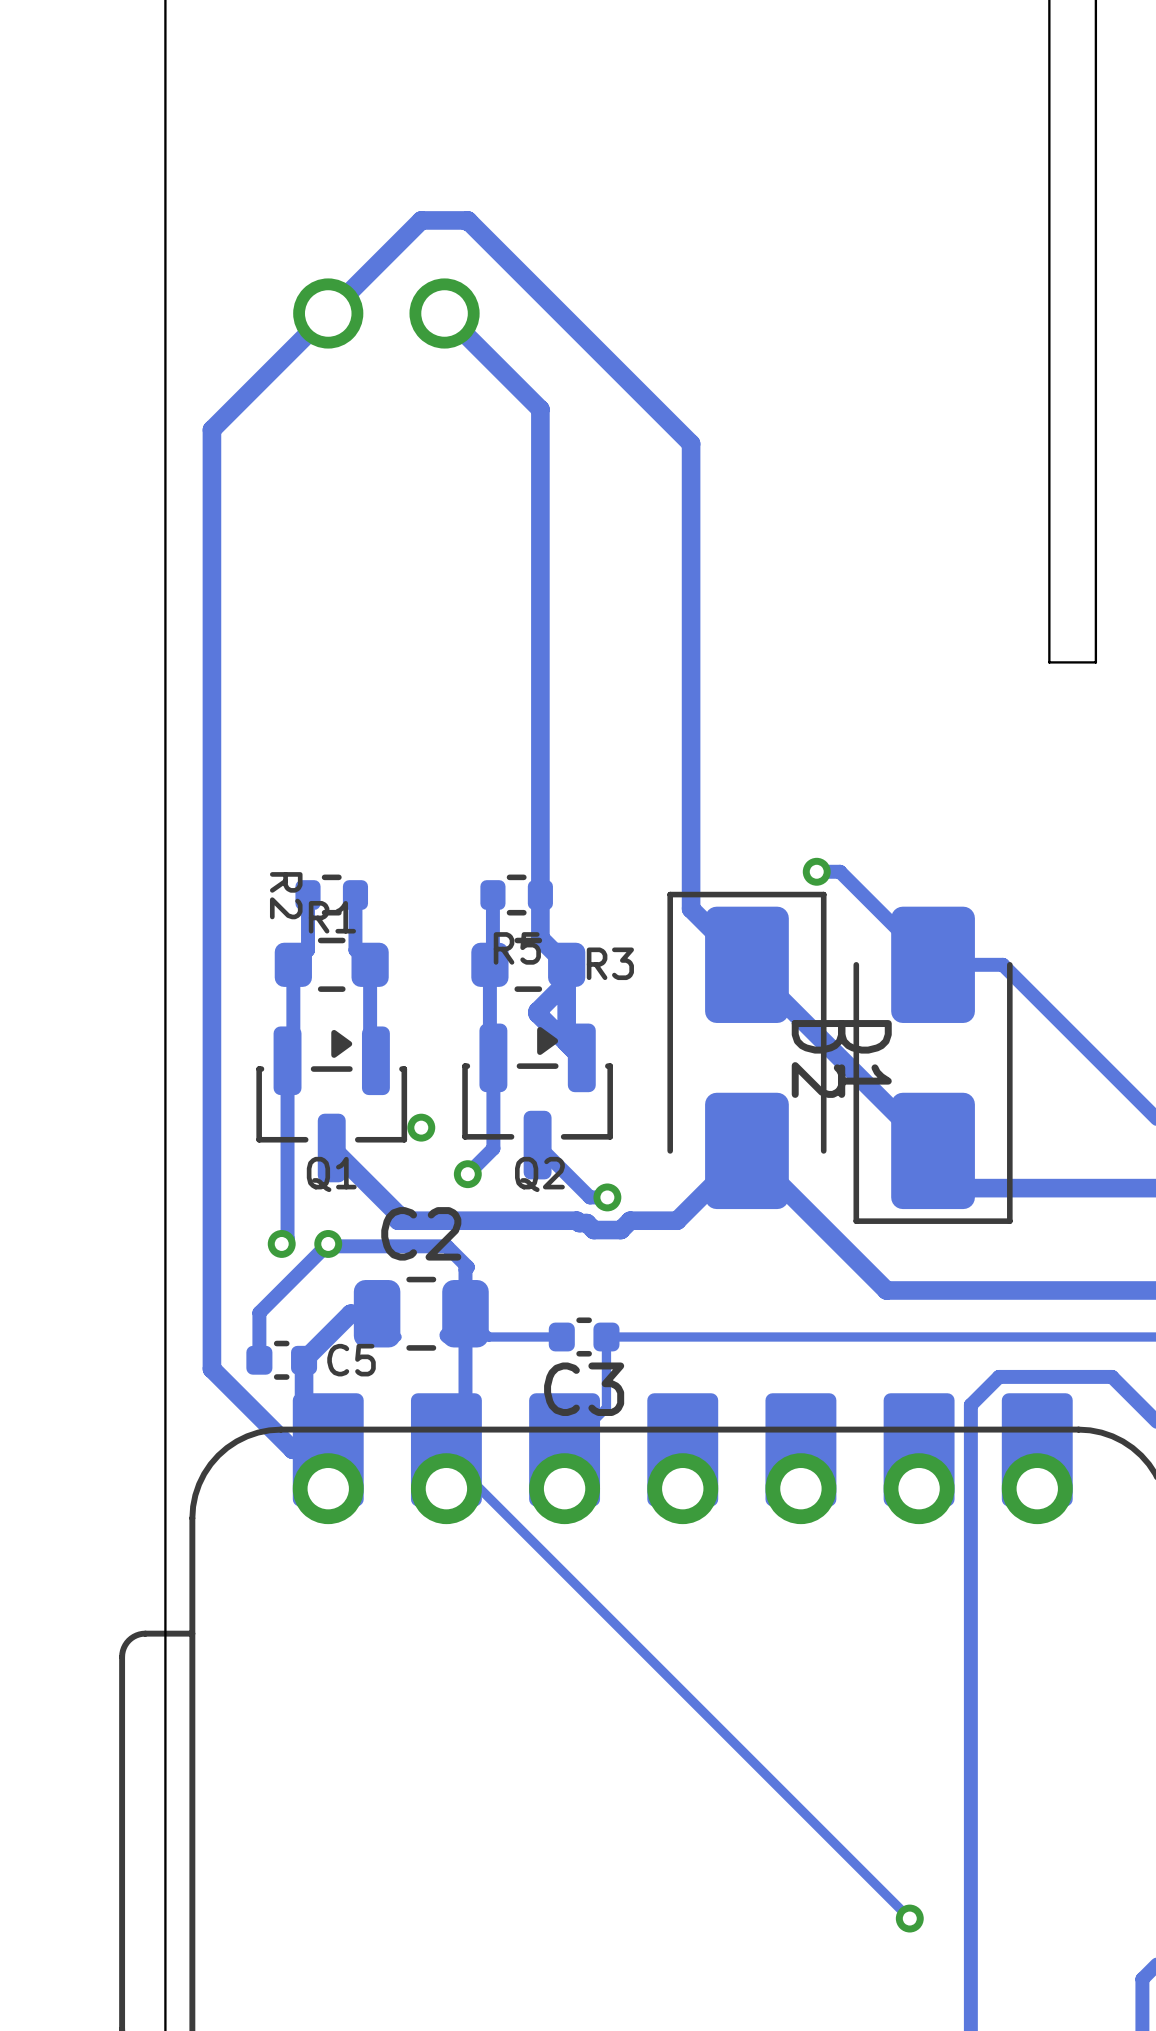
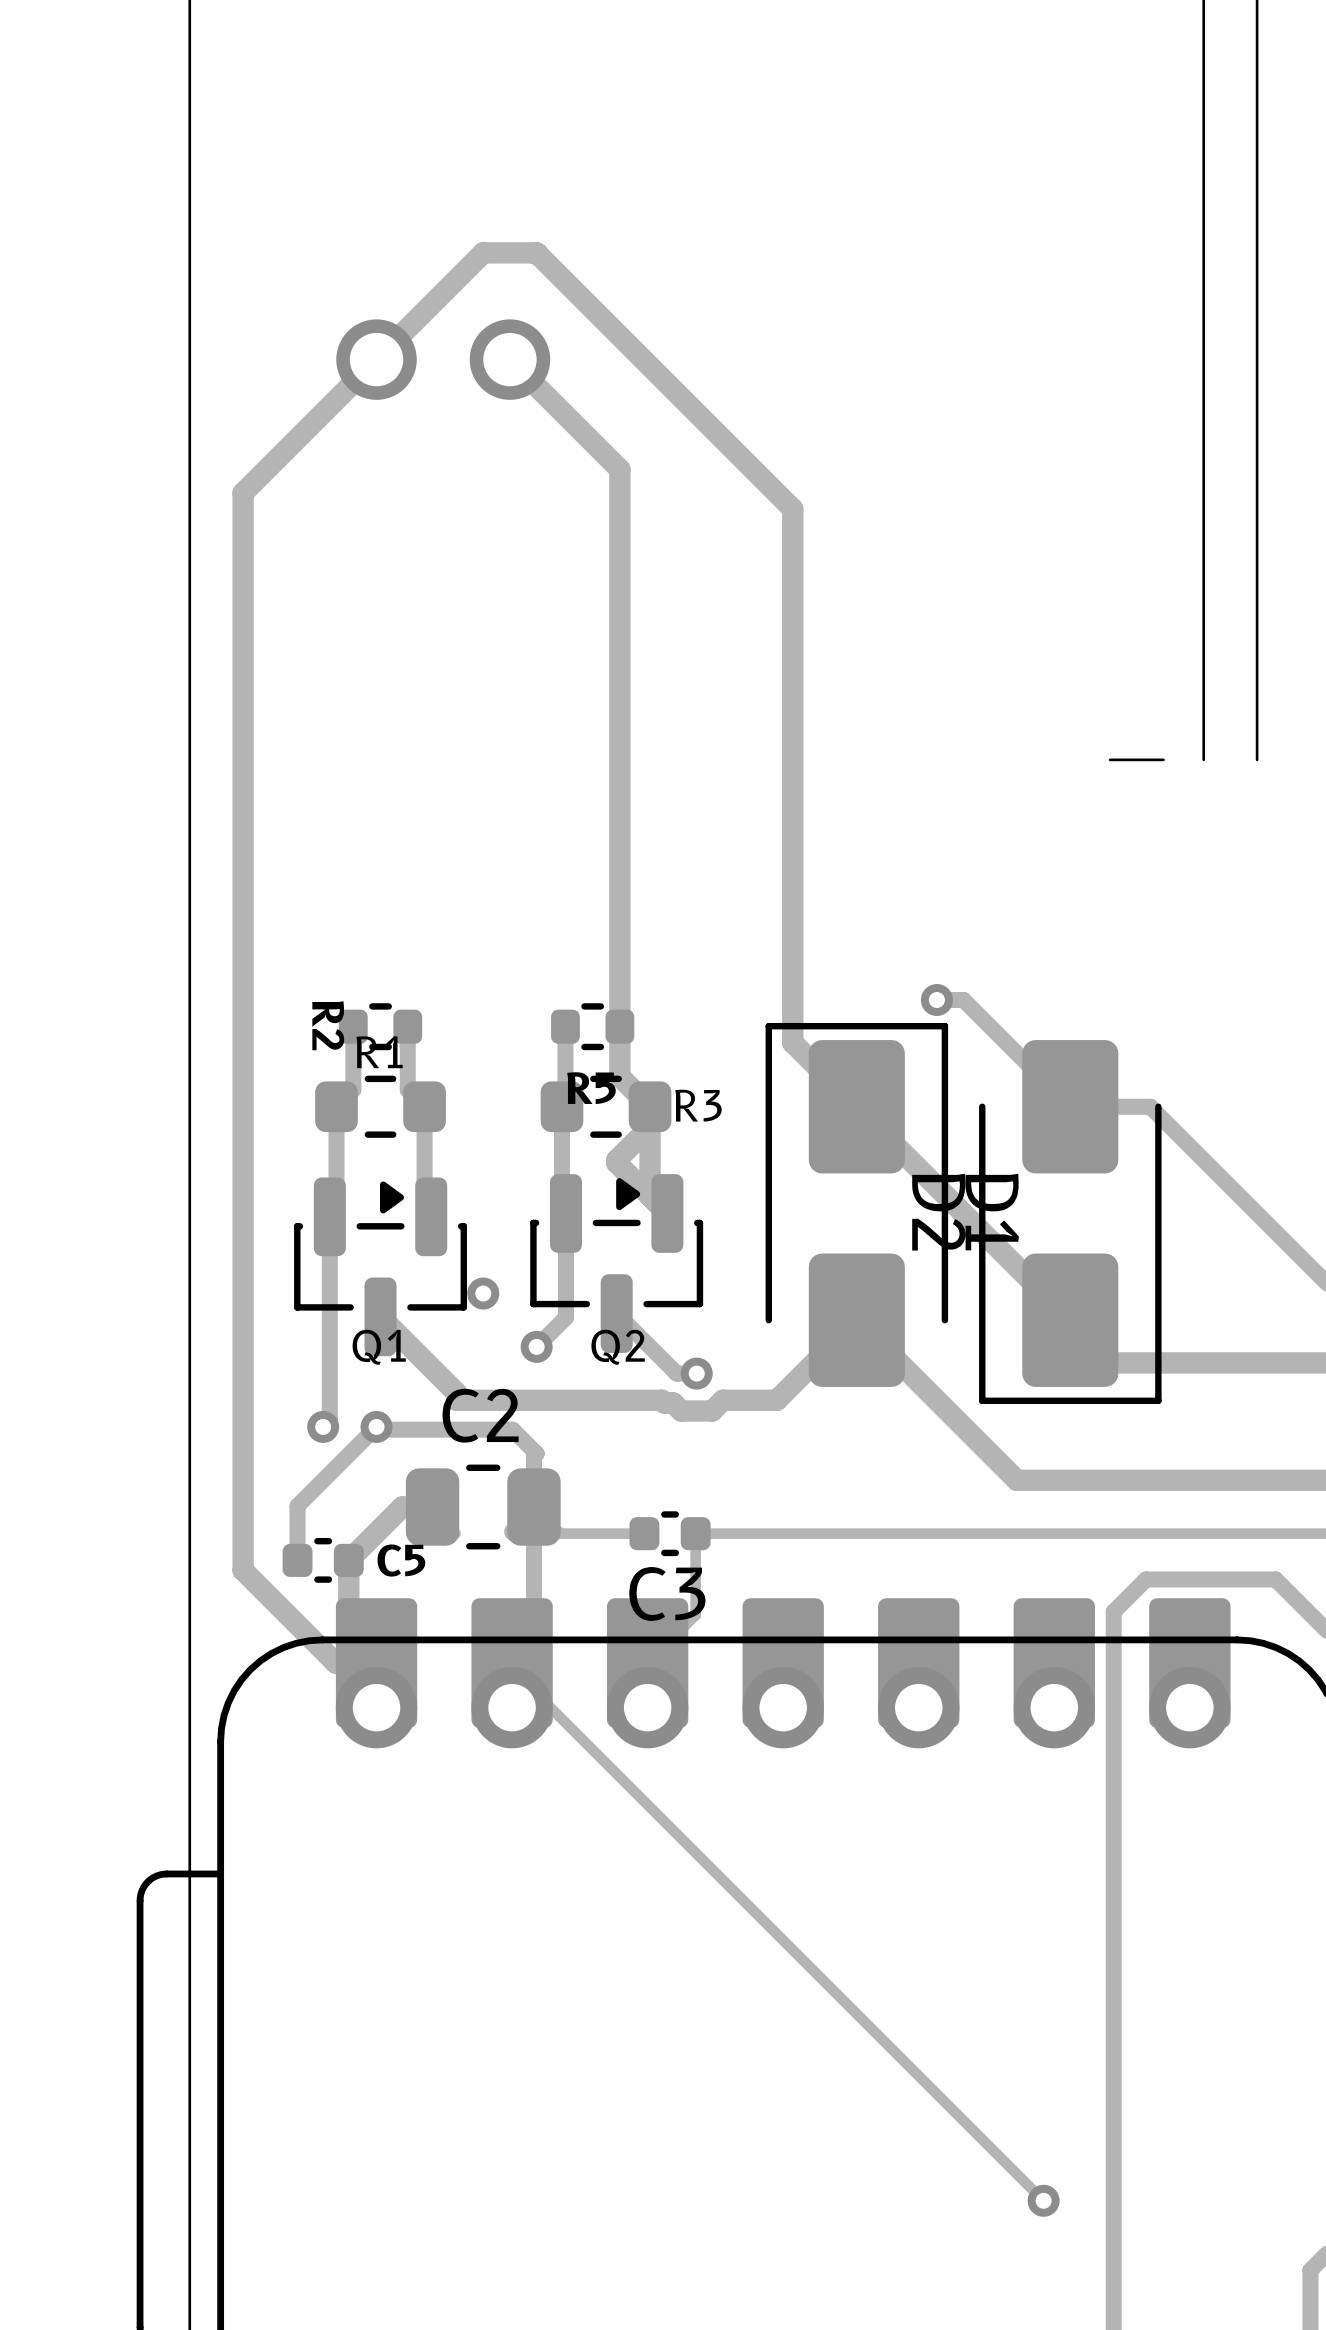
board edge: (1095, 662) (1049, 662) -> (1163, 759) (1110, 759)

